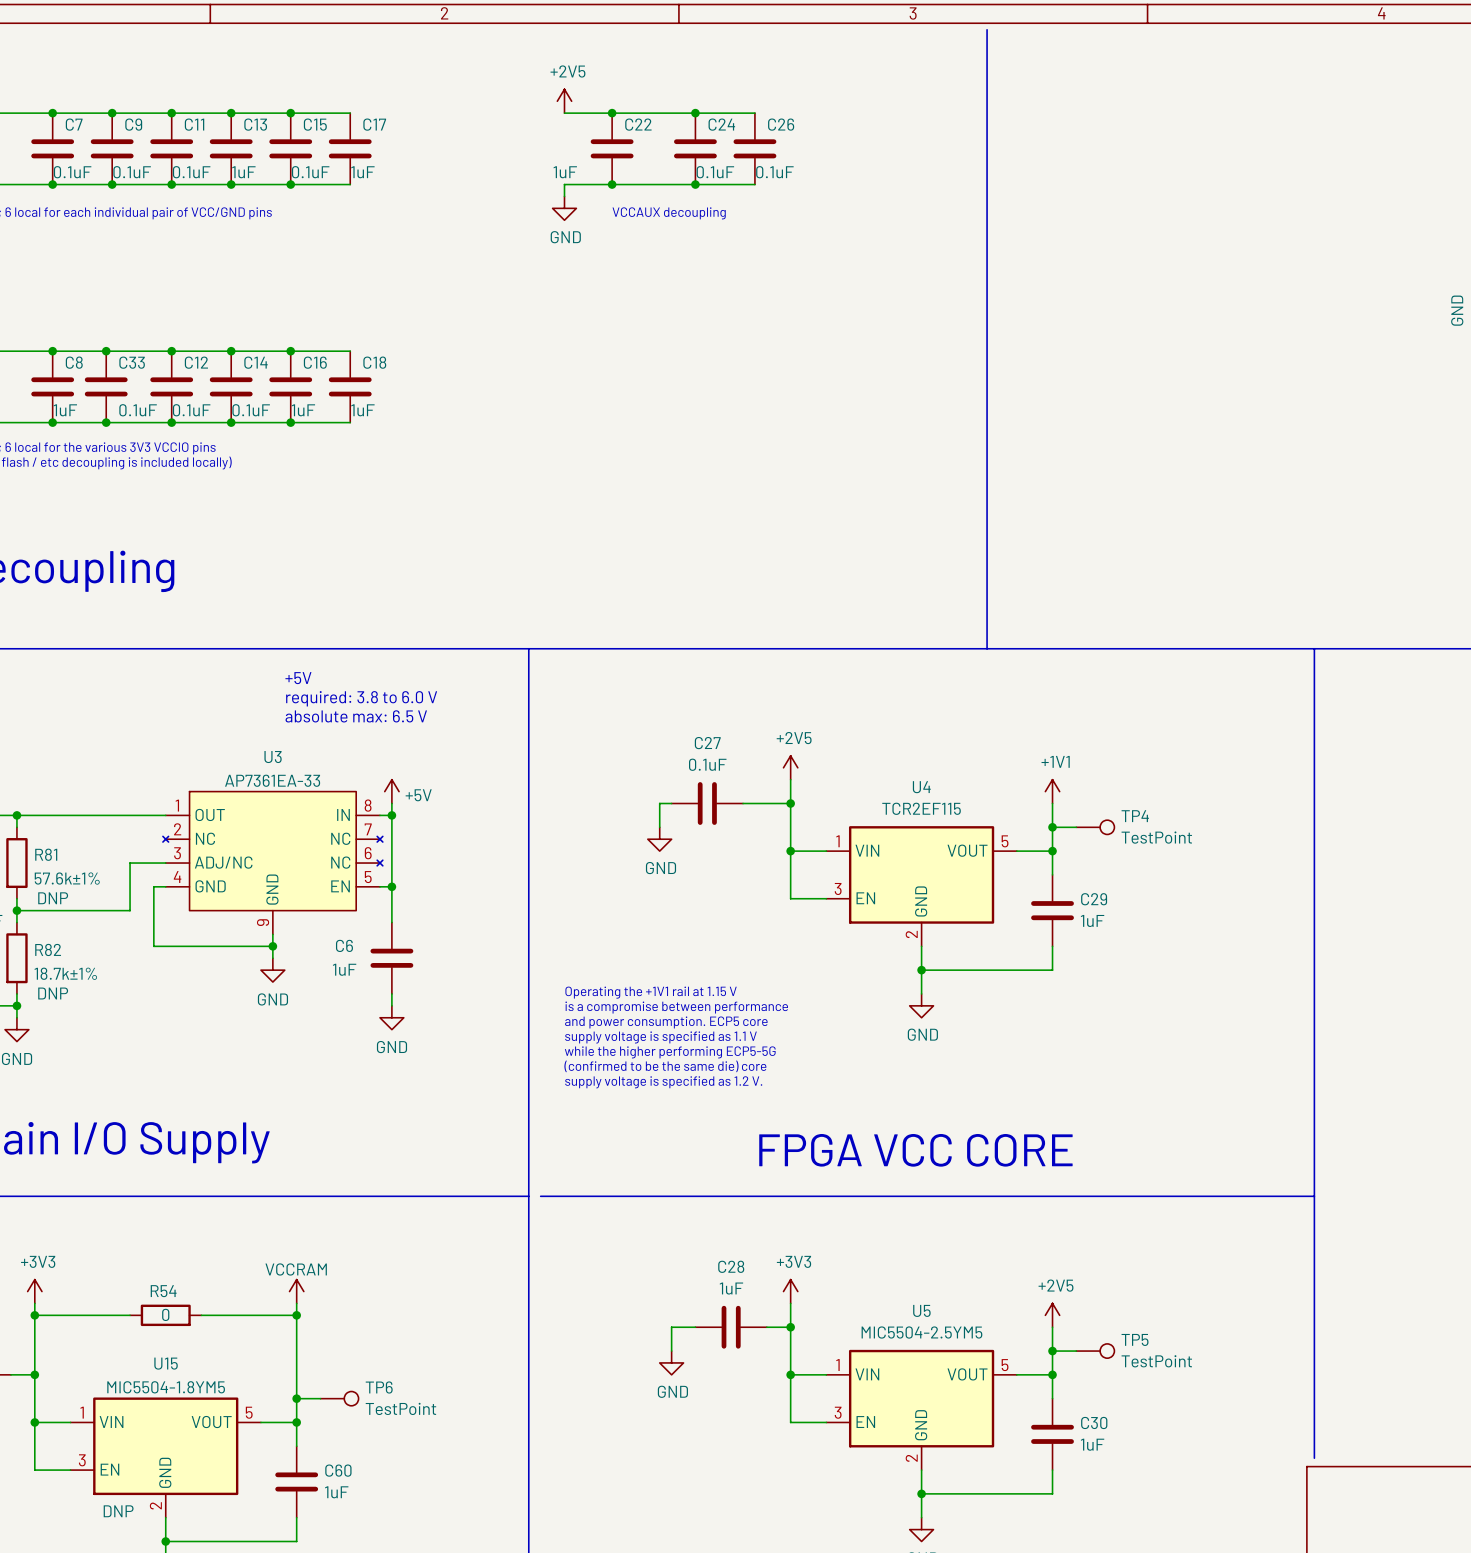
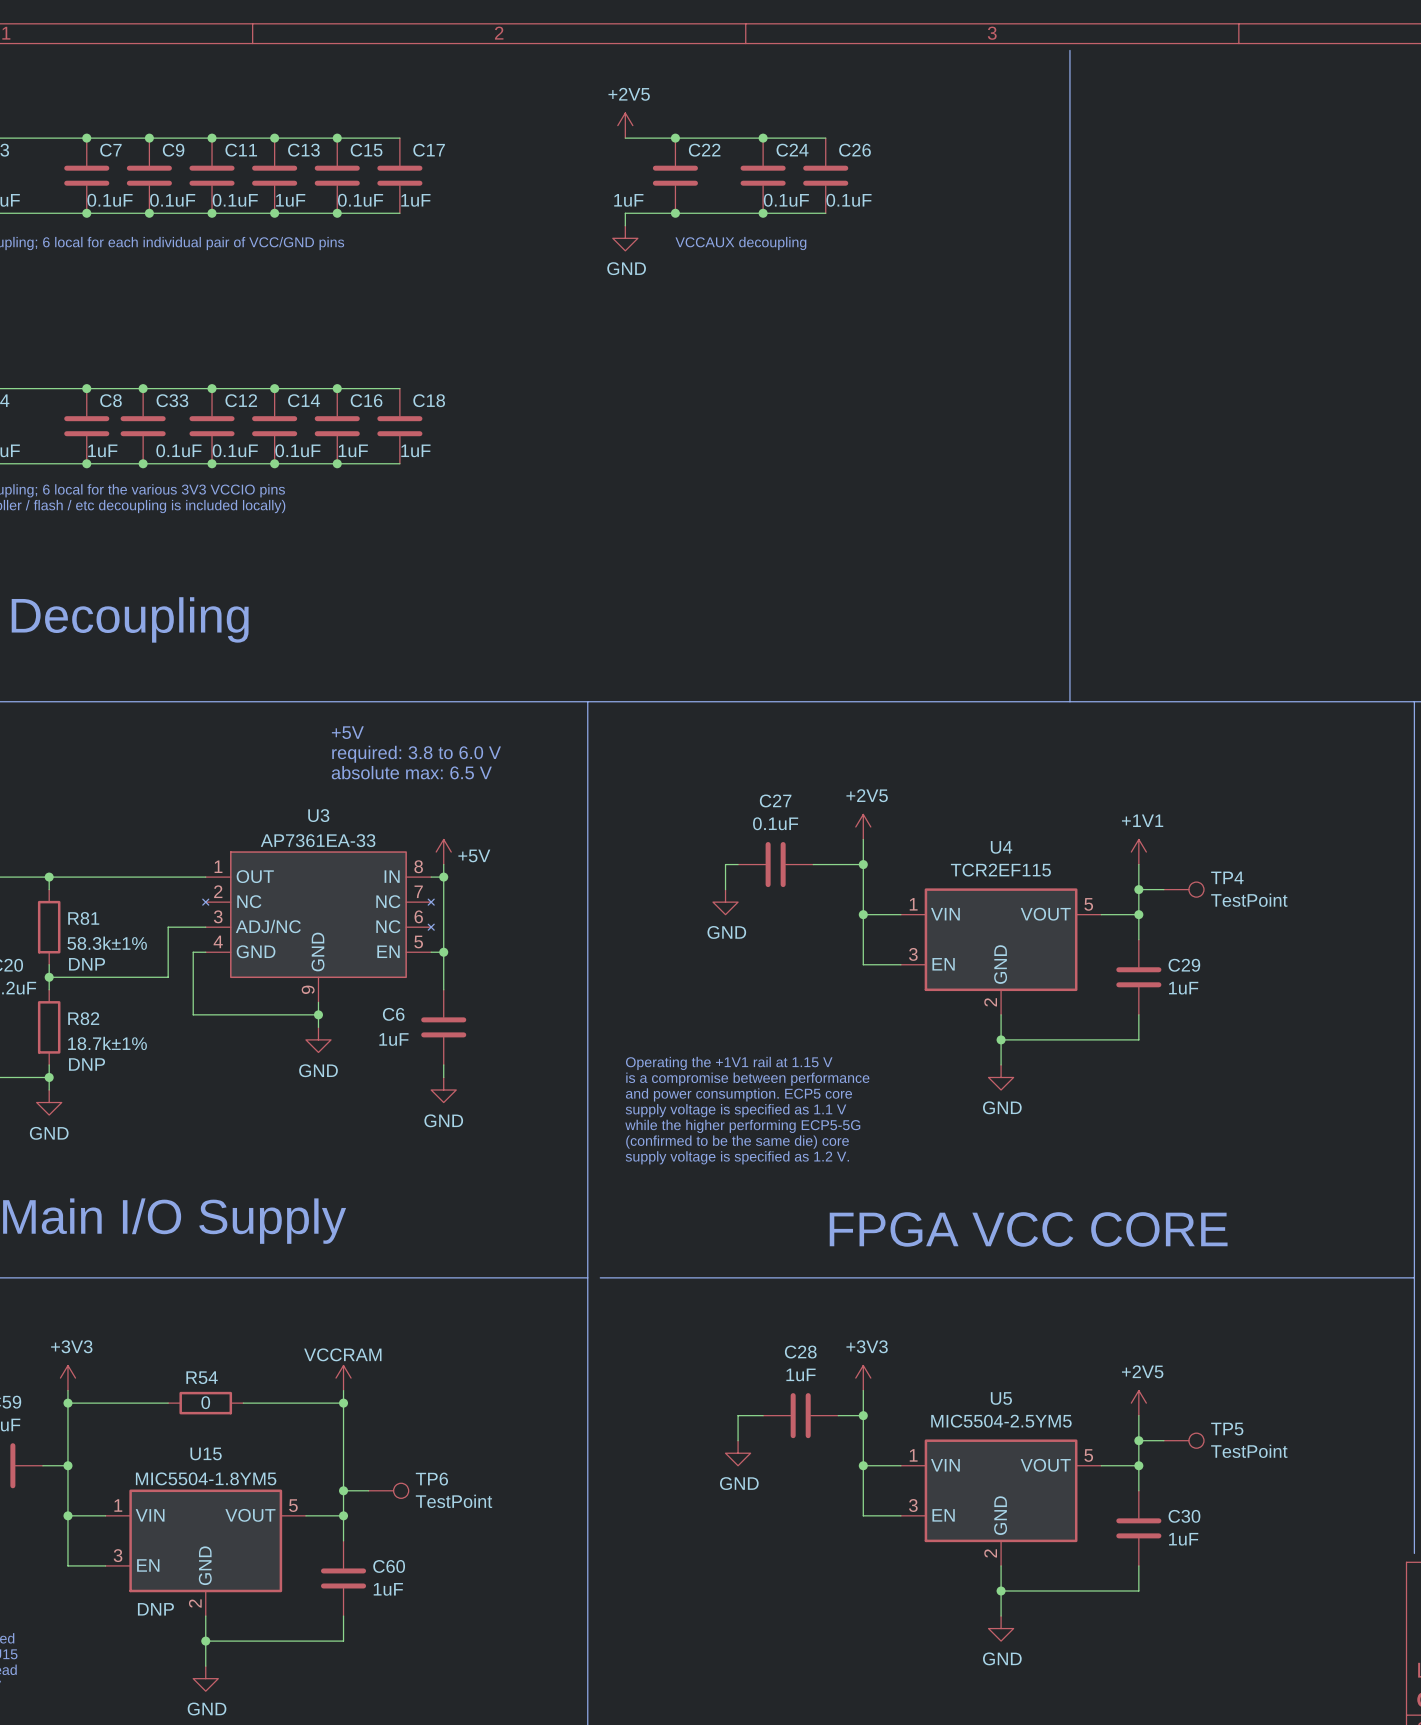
R81 value: 57.6k±1% (67, 878) -> 58.3k±1% (107, 943)

